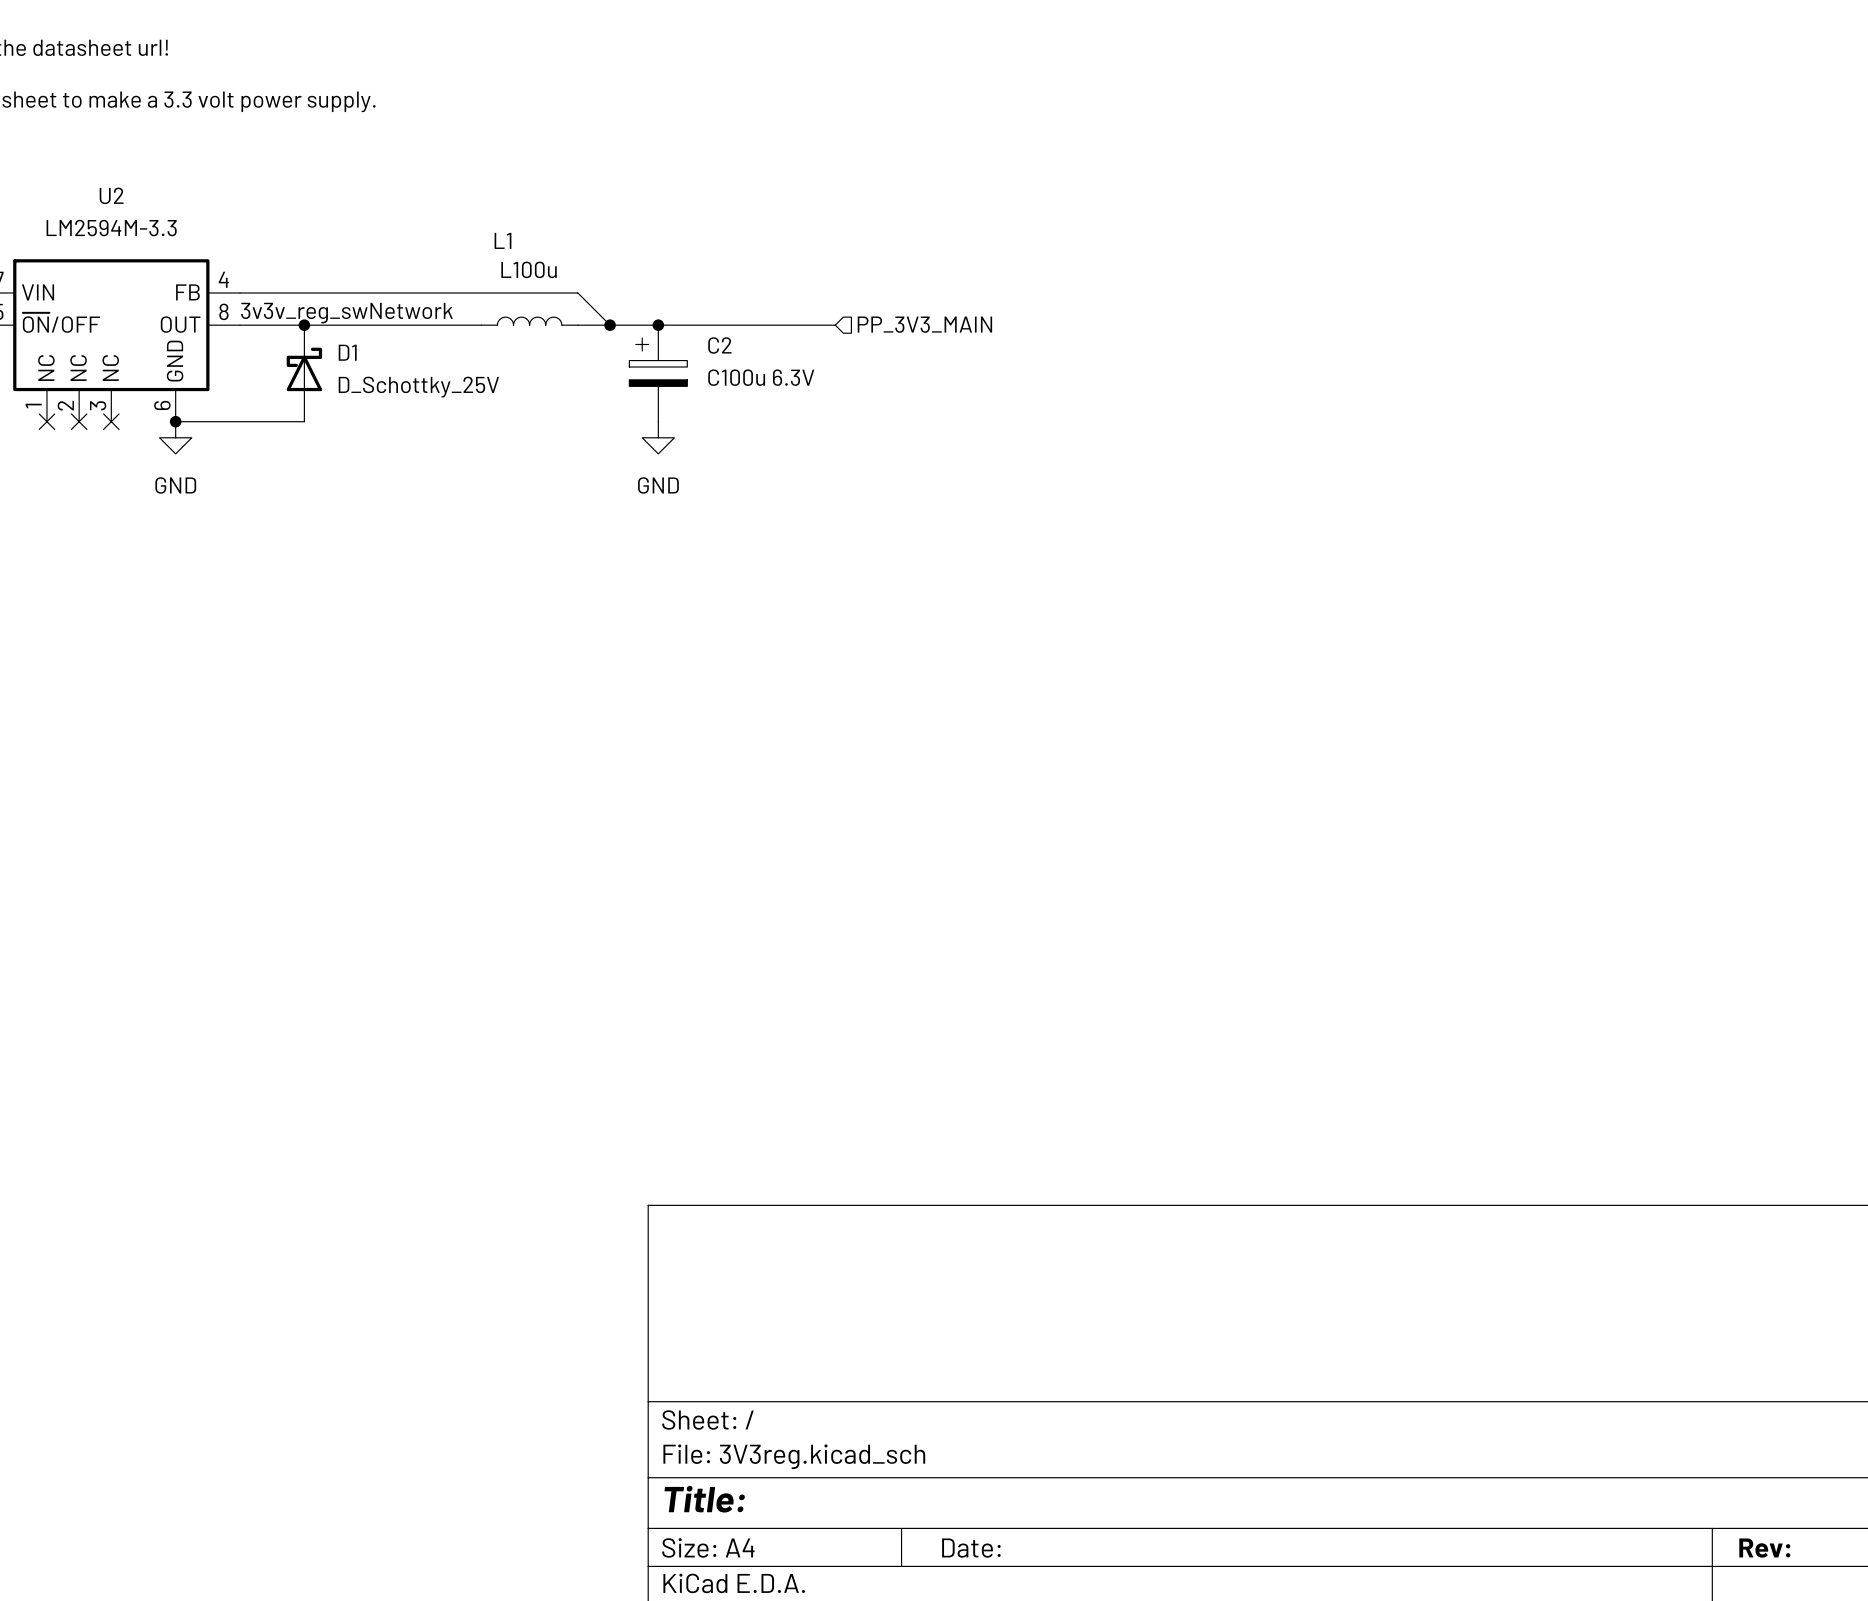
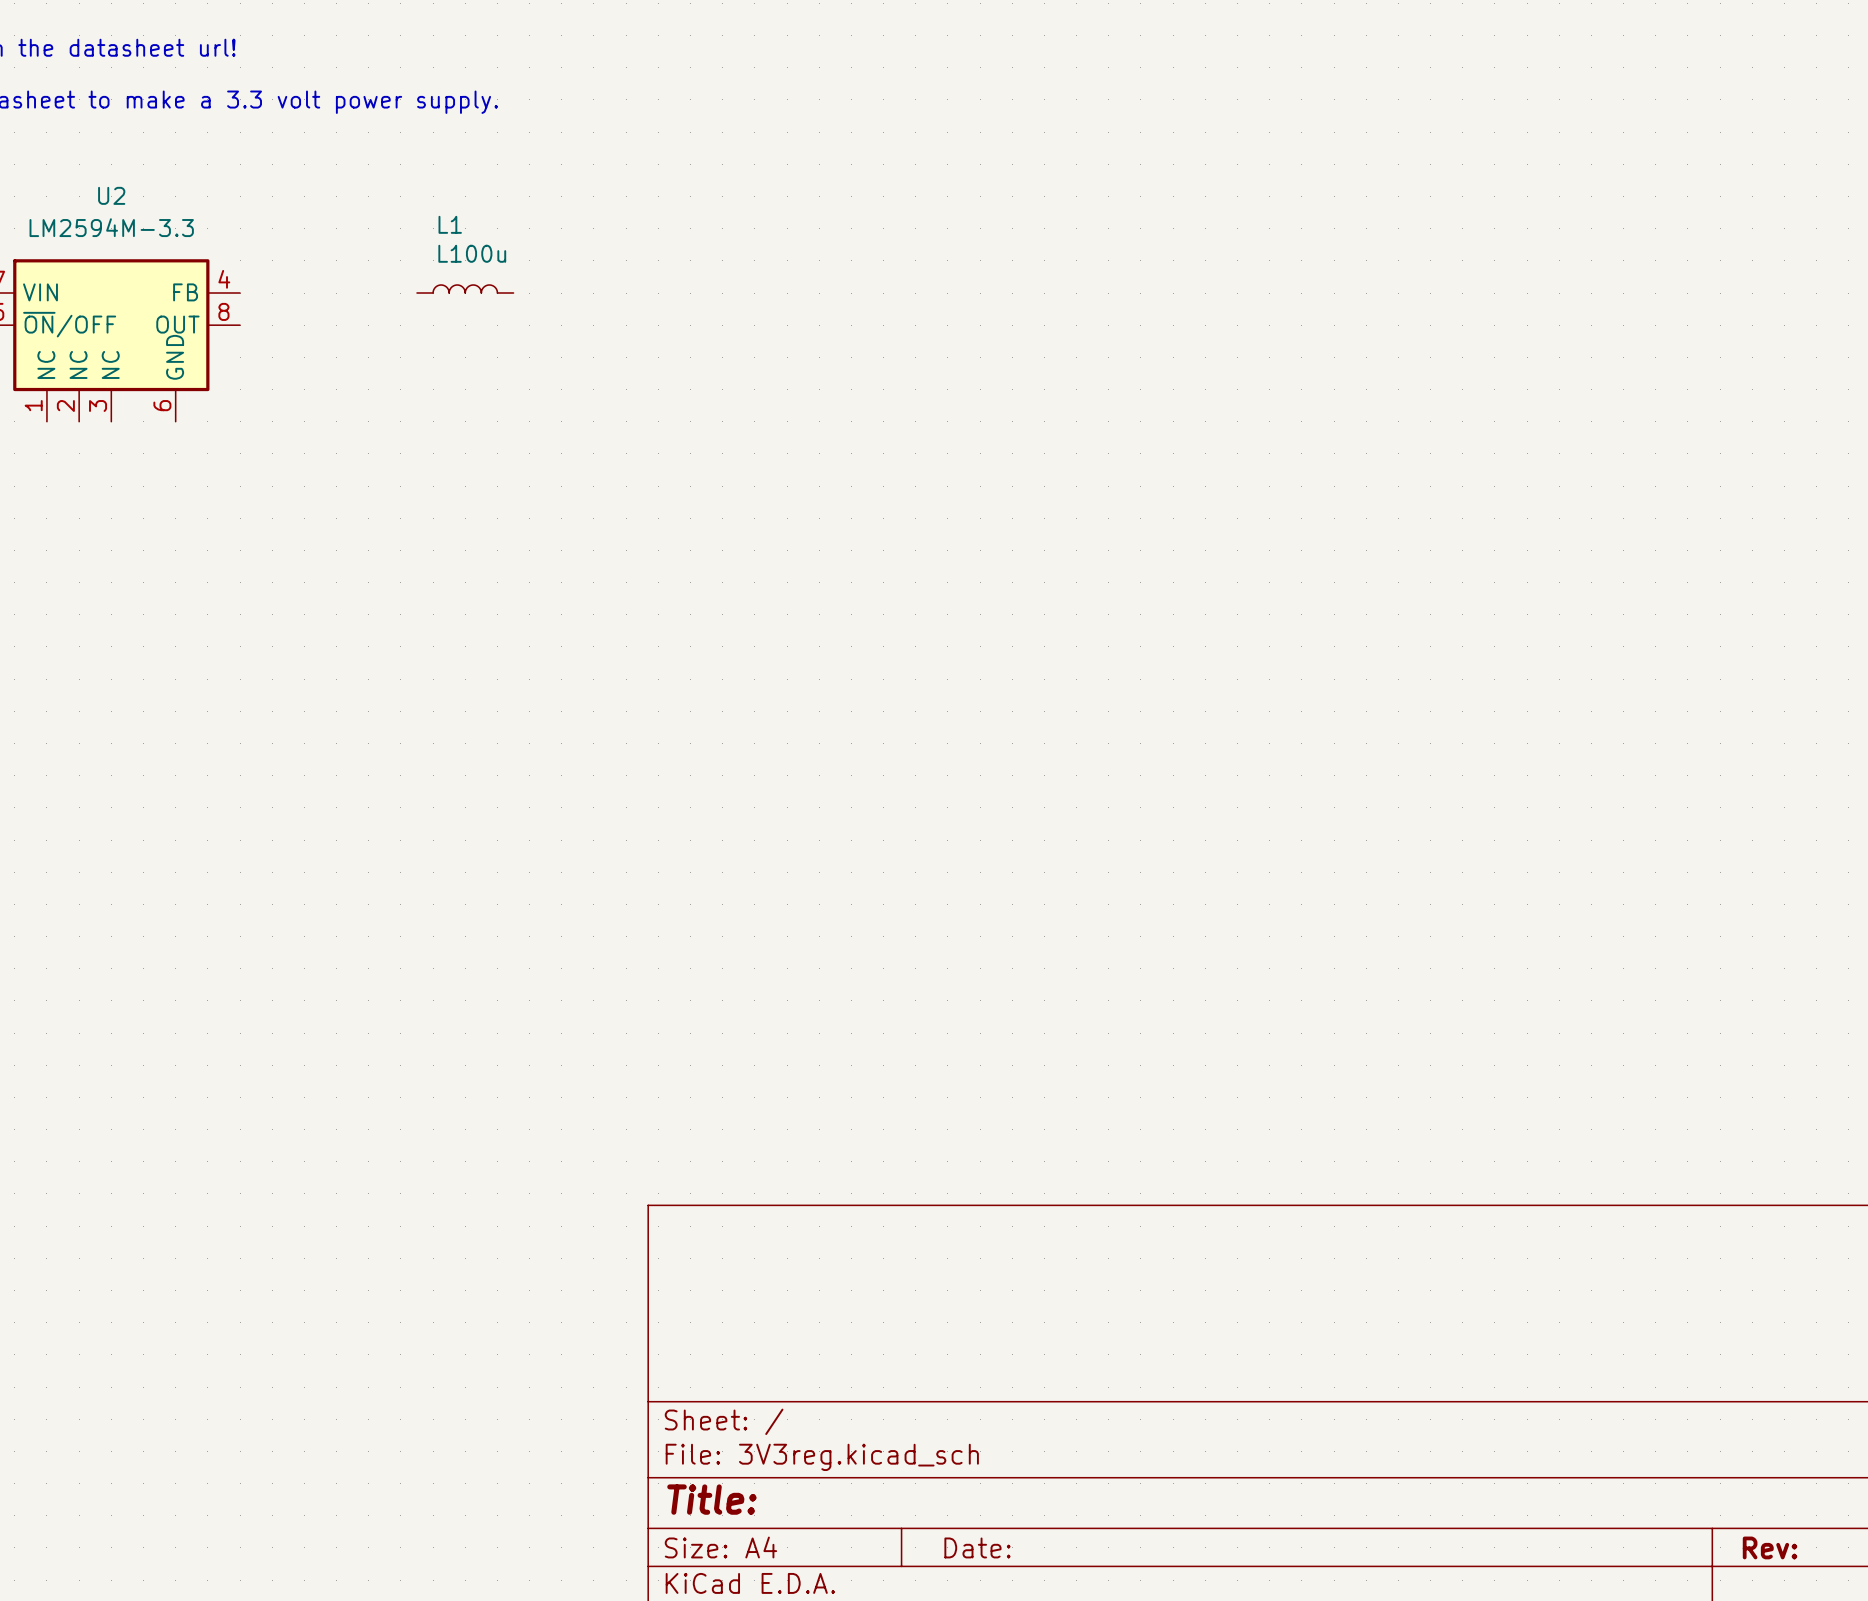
L1 name position: L1 (502, 240) -> L1 (450, 224)
L1 value position: L100u (529, 269) -> L100u (472, 253)
wire: (240, 293) (577, 293) (610, 325) -> none
label: 3v3v_reg_swNetwork (346, 313) -> none
L1 position: (529, 321) -> (465, 288)
hierarchical label: PP_3V3_MAIN (924, 324) -> none
wire: (240, 325) (481, 325) -> none
junction: (304, 325) -> none
wire: (577, 325) (835, 325) -> none
junction: (610, 325) -> none
junction: (658, 325) -> none
D1: D_Schottky_25V (304, 373) -> none
C2: C100u 6.3V (658, 373) -> none
no-connect mark: (46, 421) -> none
no-connect mark: (79, 421) -> none
no-connect mark: (111, 421) -> none
wire: (175, 421) (304, 421) -> none
junction: (175, 421) -> none
power symbol: GND (175, 437) -> none
power symbol: GND (658, 437) -> none

